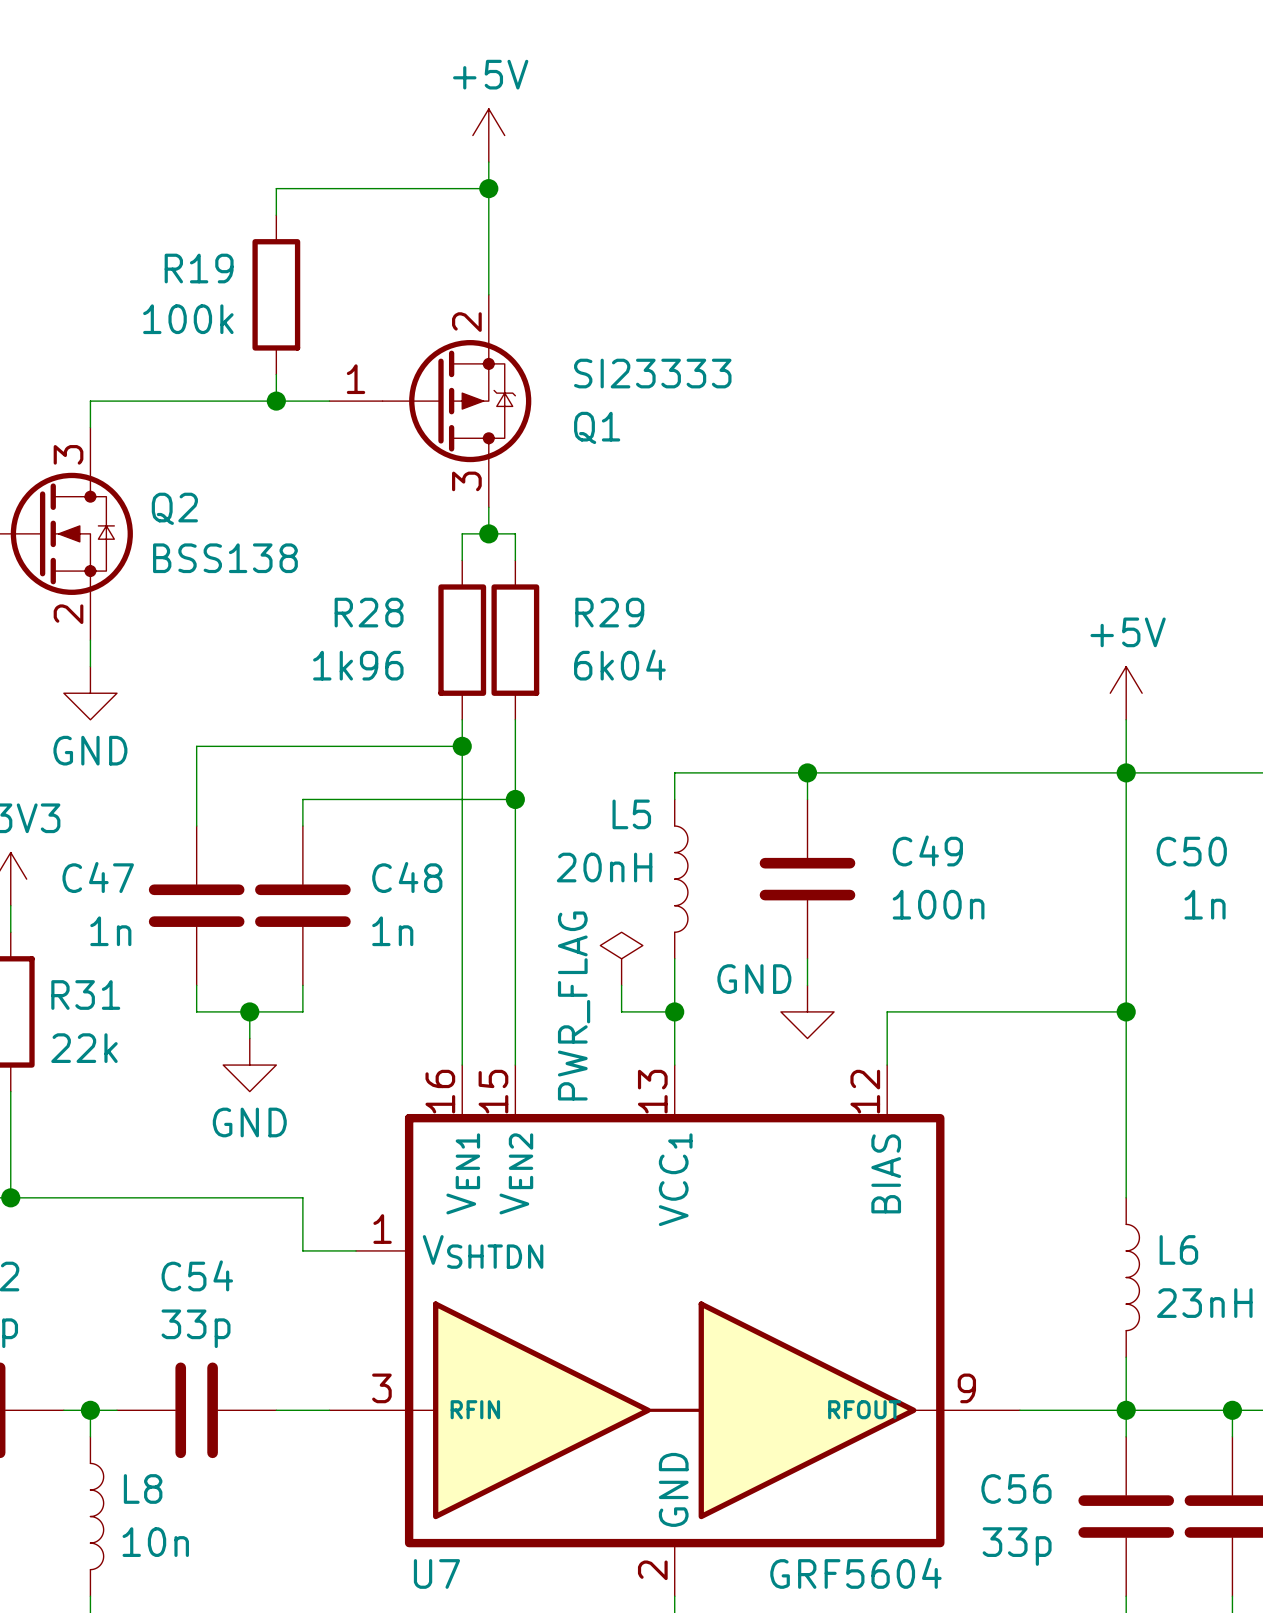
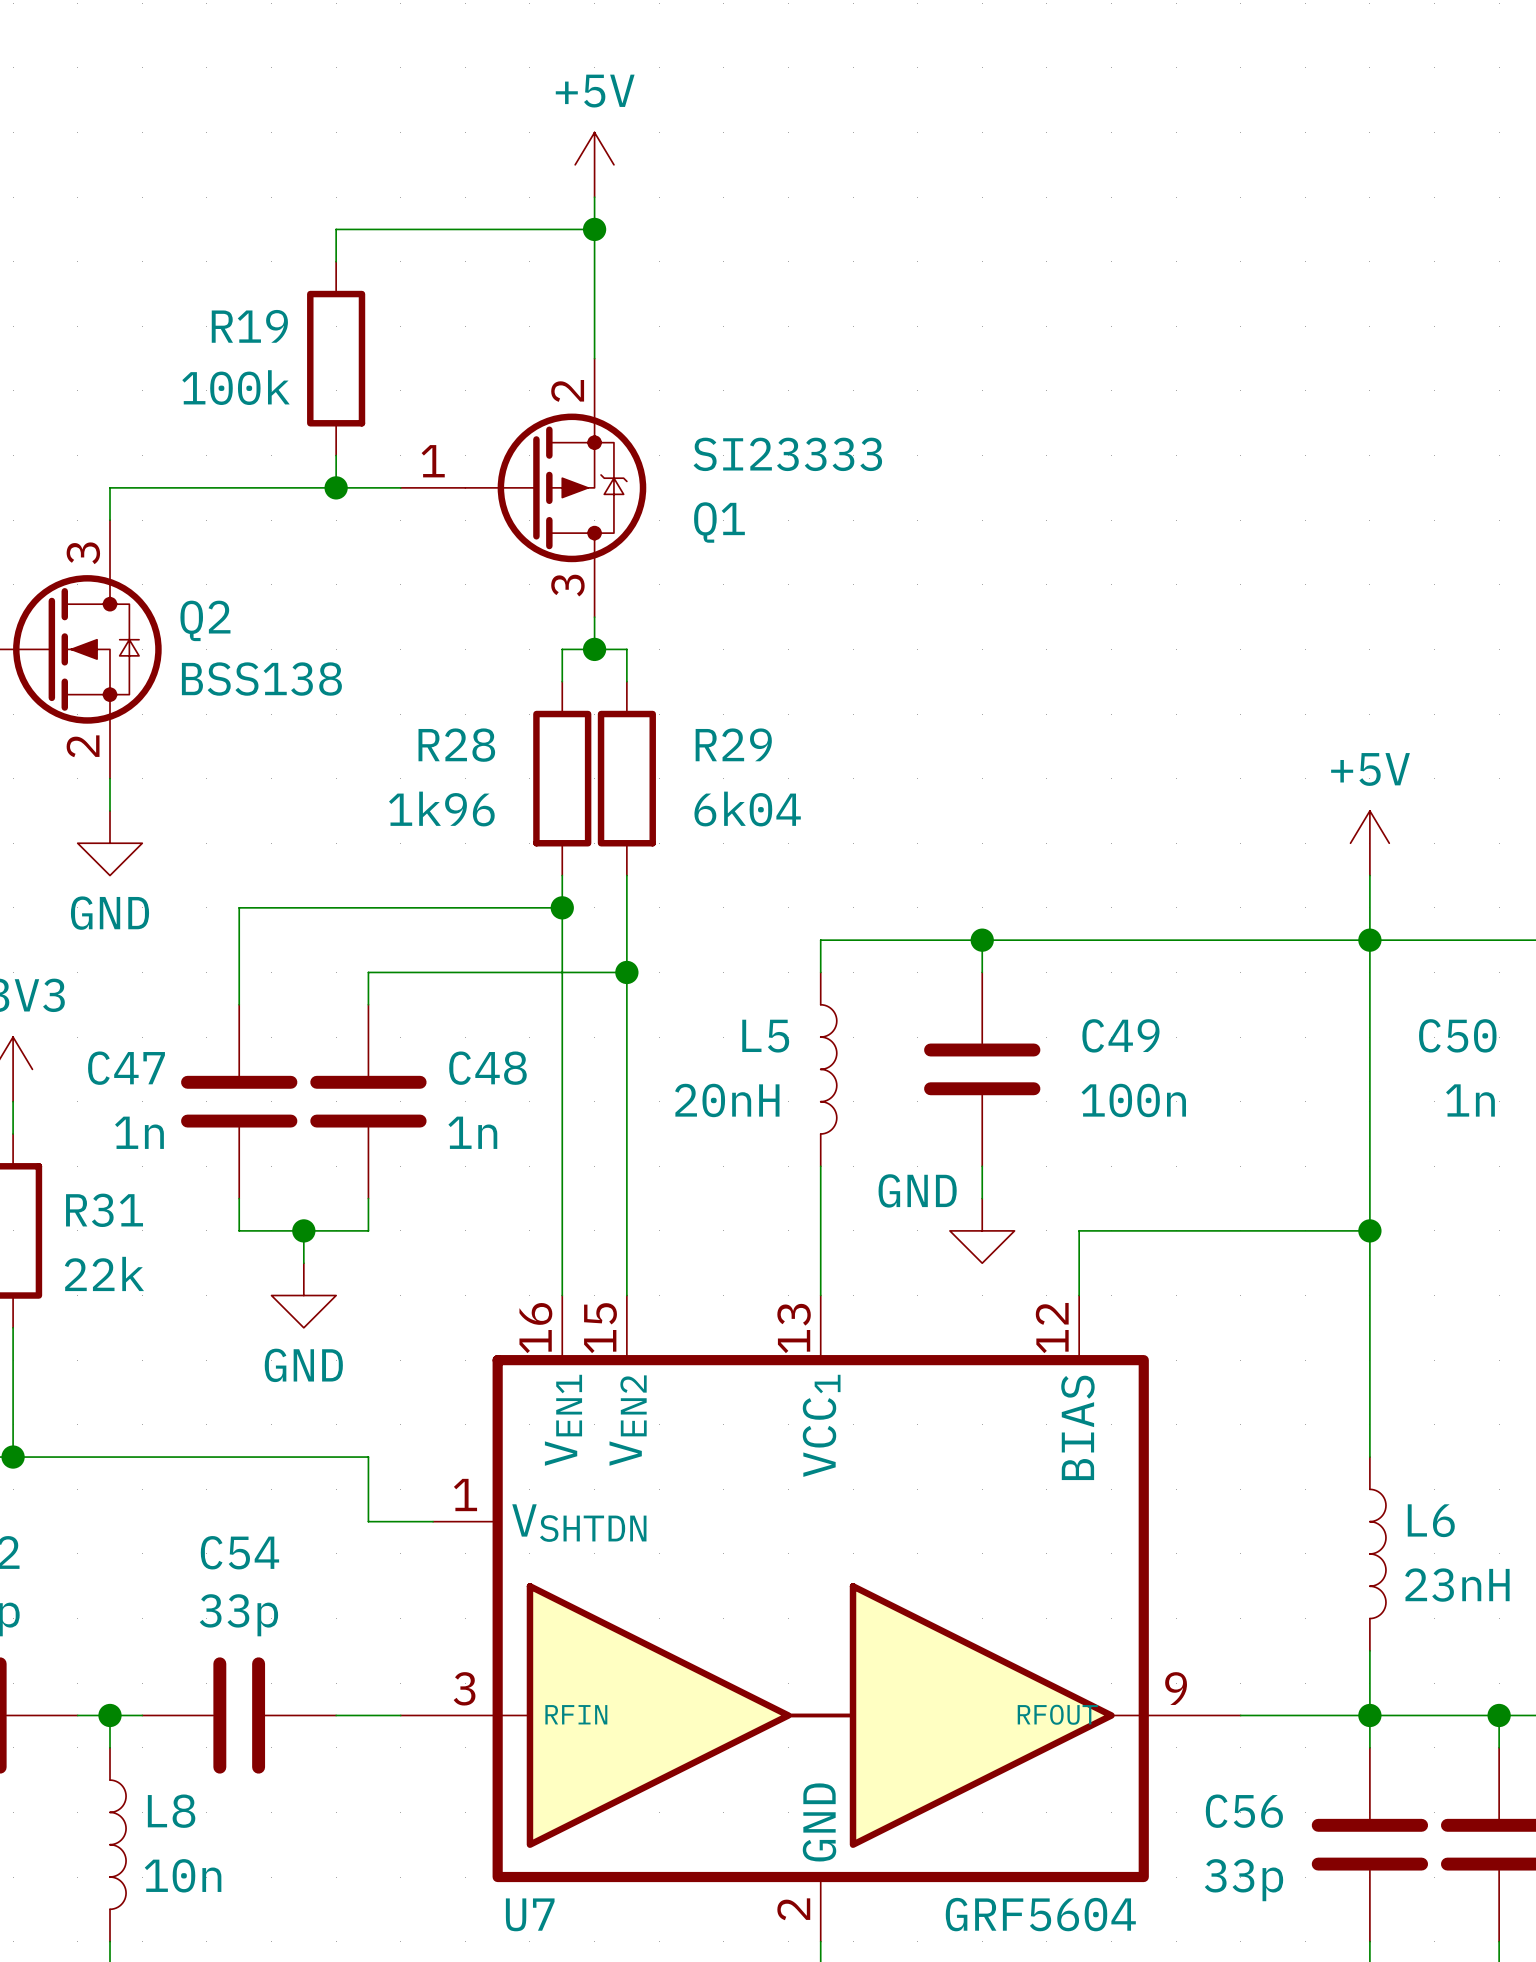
L5 name position: L5 (631, 814) -> L5 (765, 1036)
L5 value position: 20nH (604, 867) -> 20nH (727, 1100)
power symbol: PWR_FLAG (621, 958) -> none
wire: (621, 985) (621, 1011) (674, 1011) -> none
junction: (674, 1011) -> none

